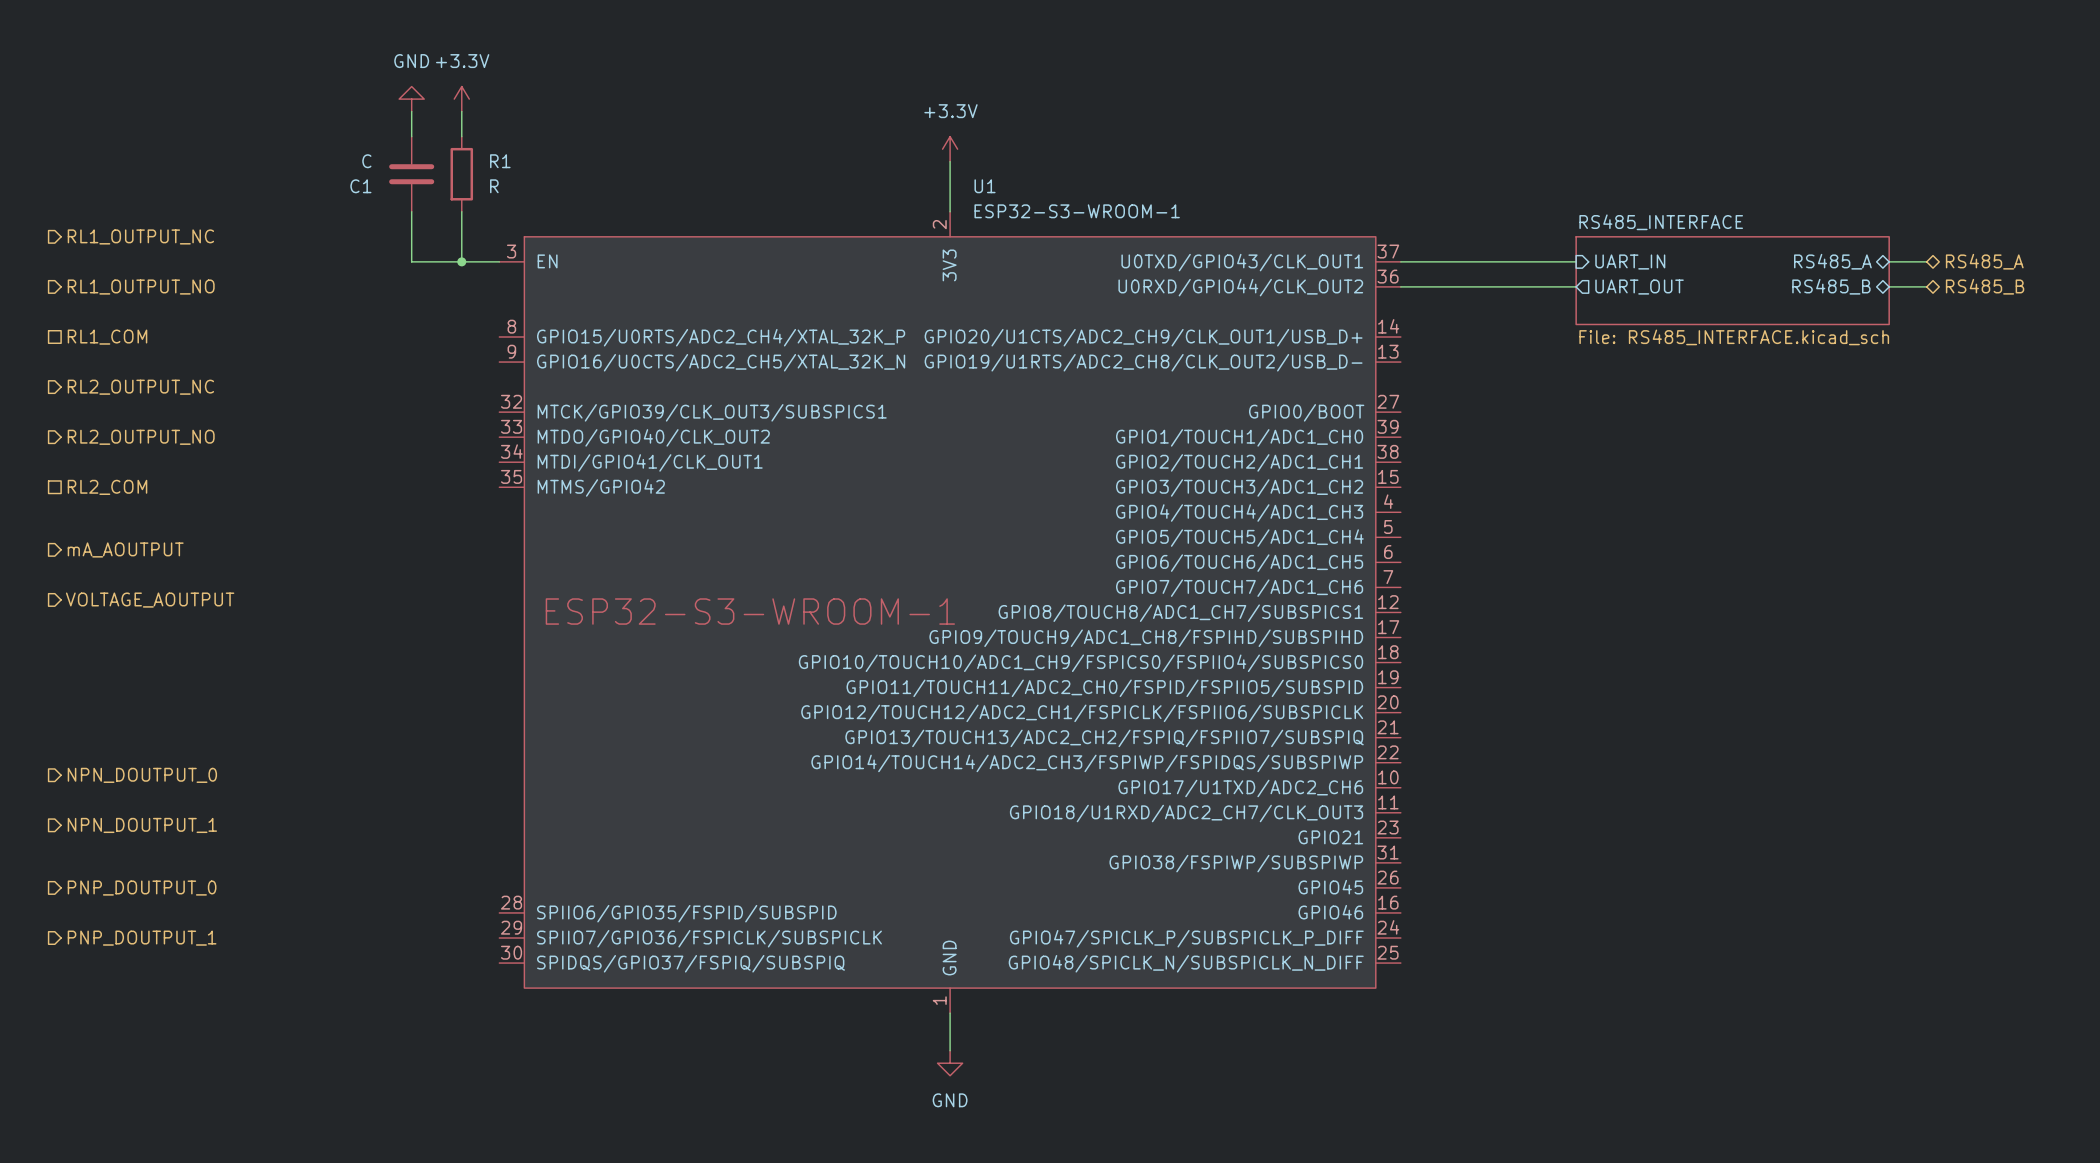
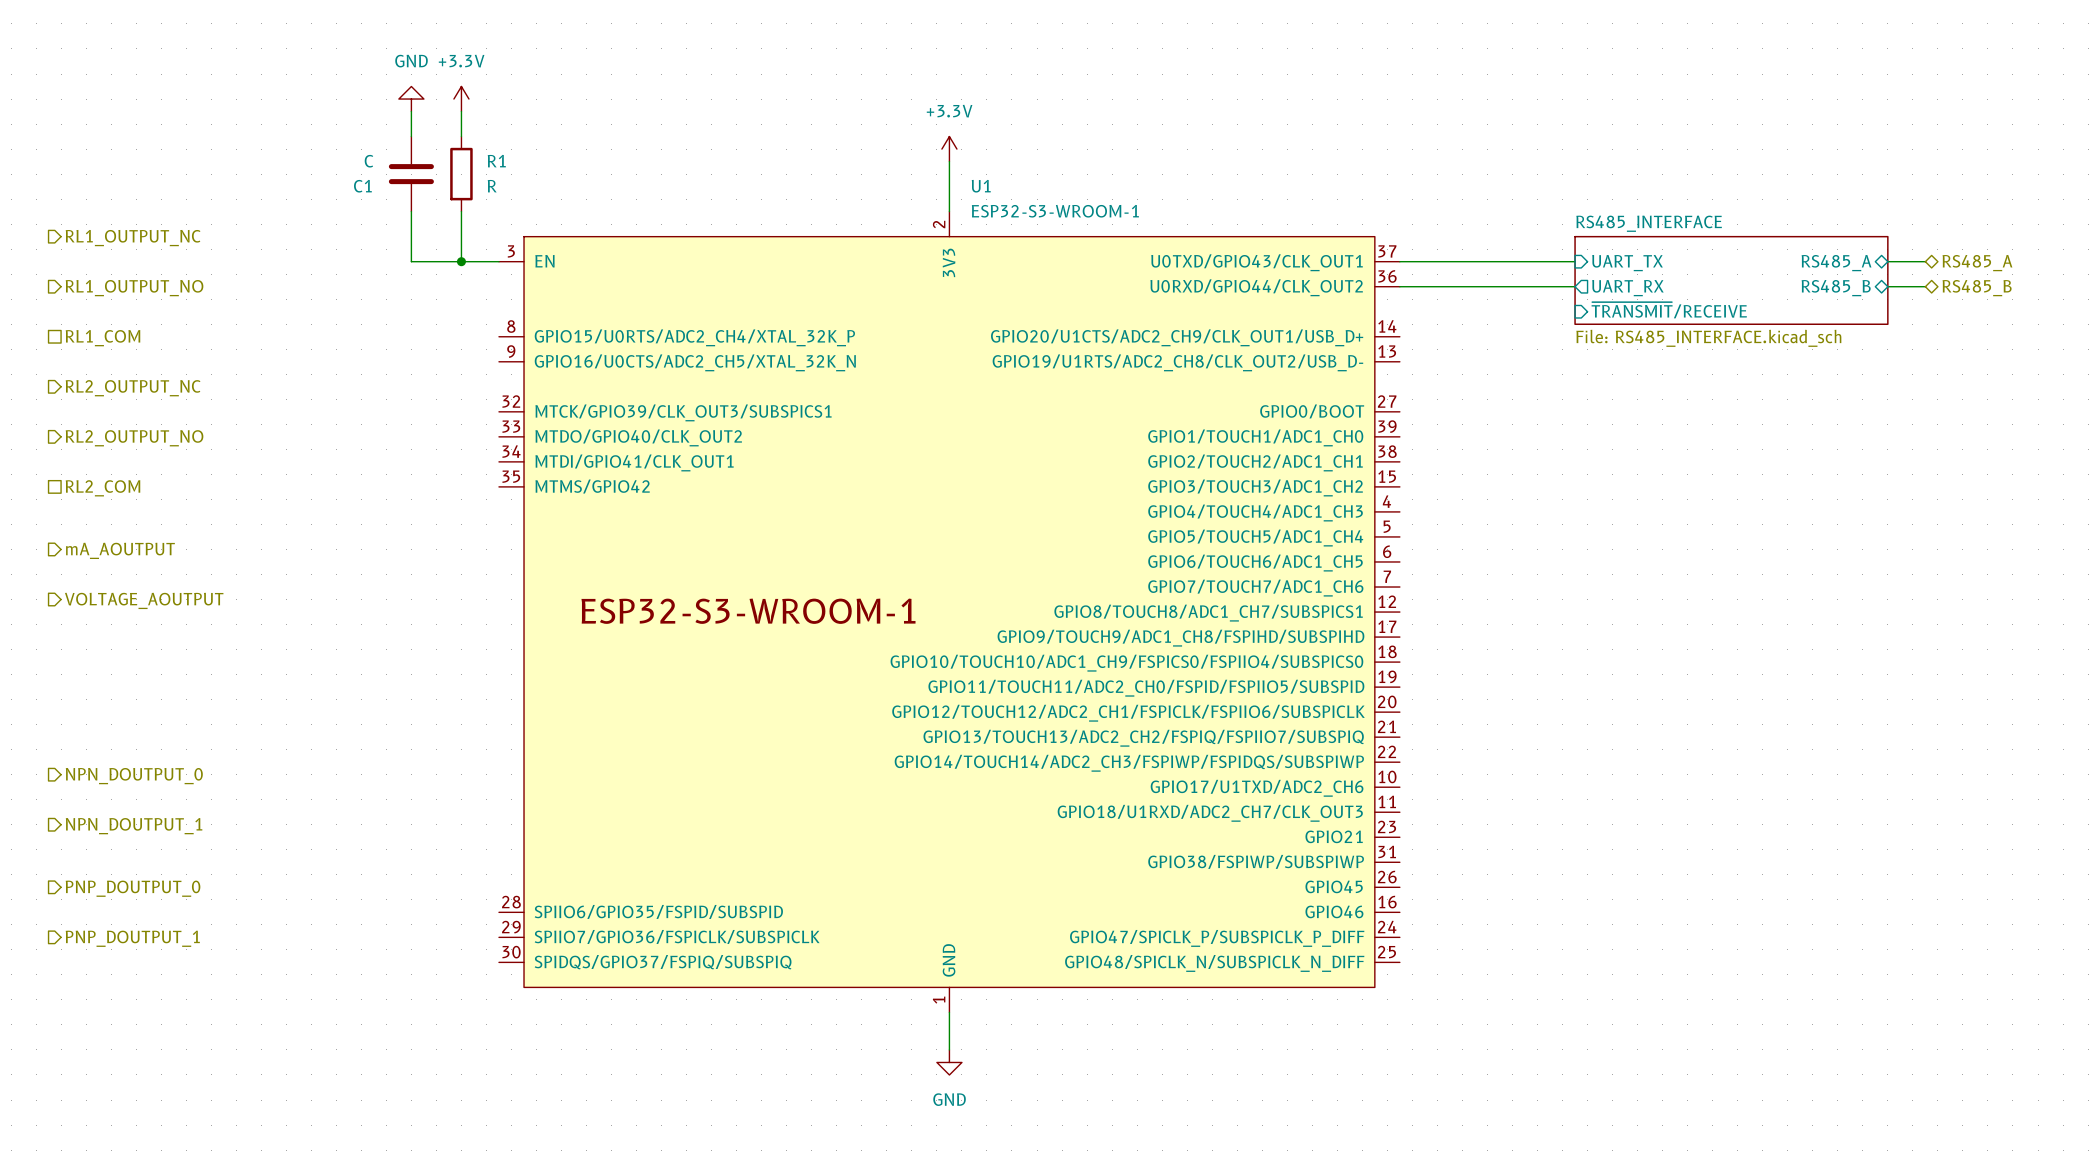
sheet pin: UART_IN (1630, 262) -> UART_TX (1627, 263)
sheet pin: UART_OUT (1639, 287) -> UART_RX (1627, 288)
sheet pin: none -> ~{TRANSMIT}/RECEIVE (1669, 310)

